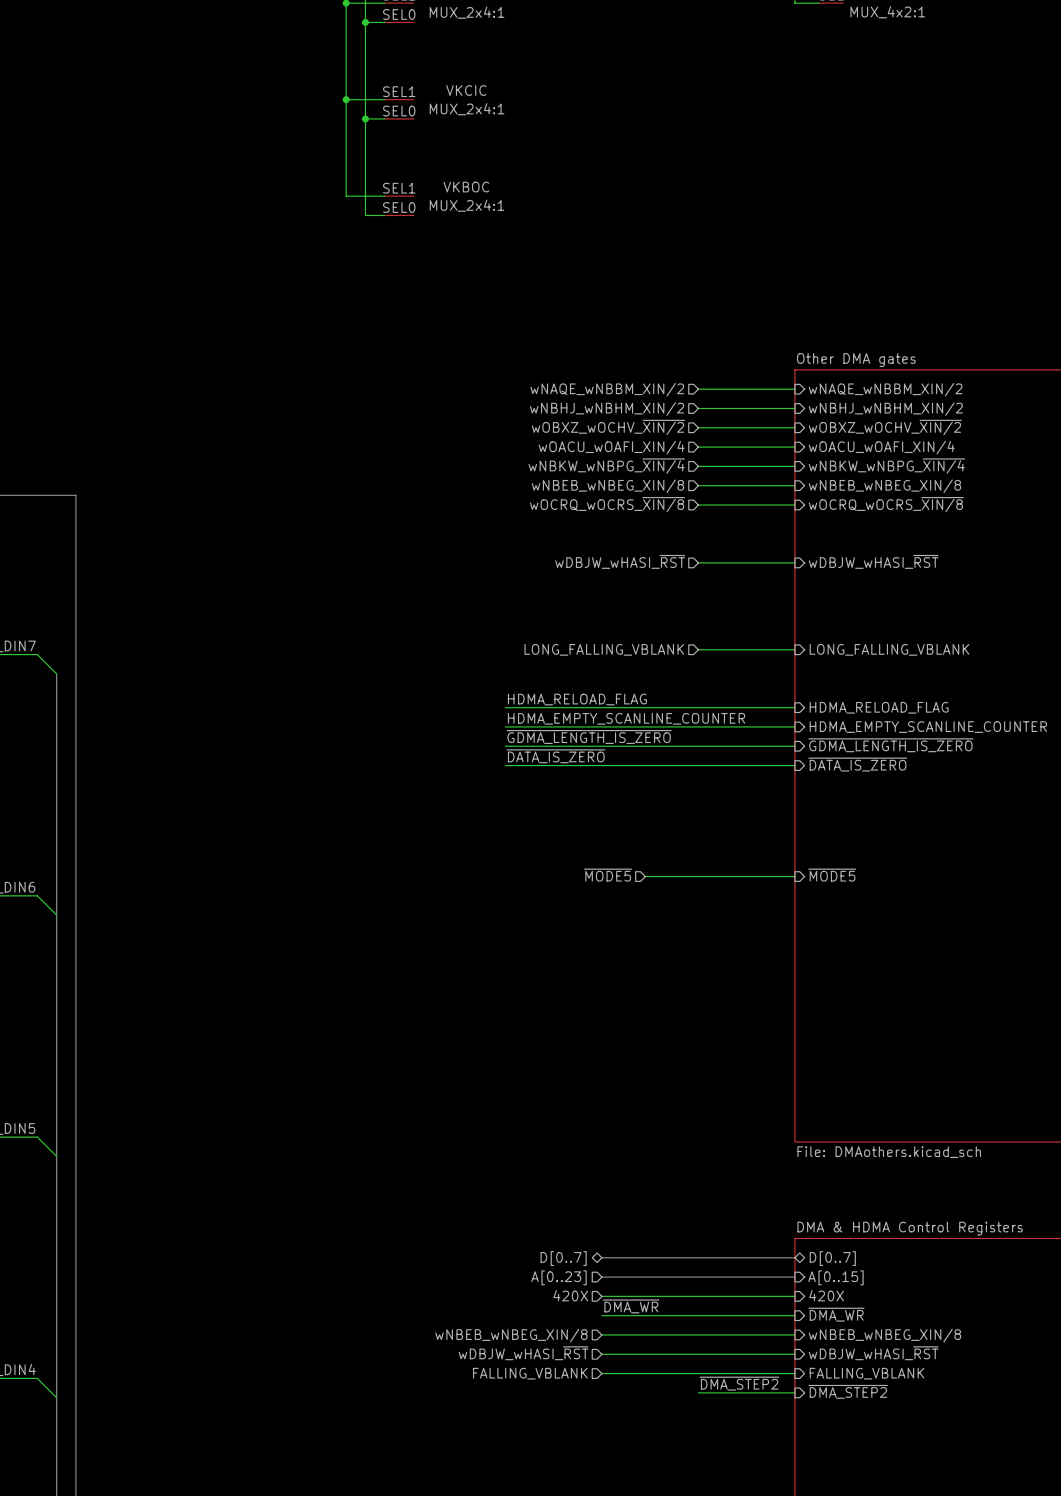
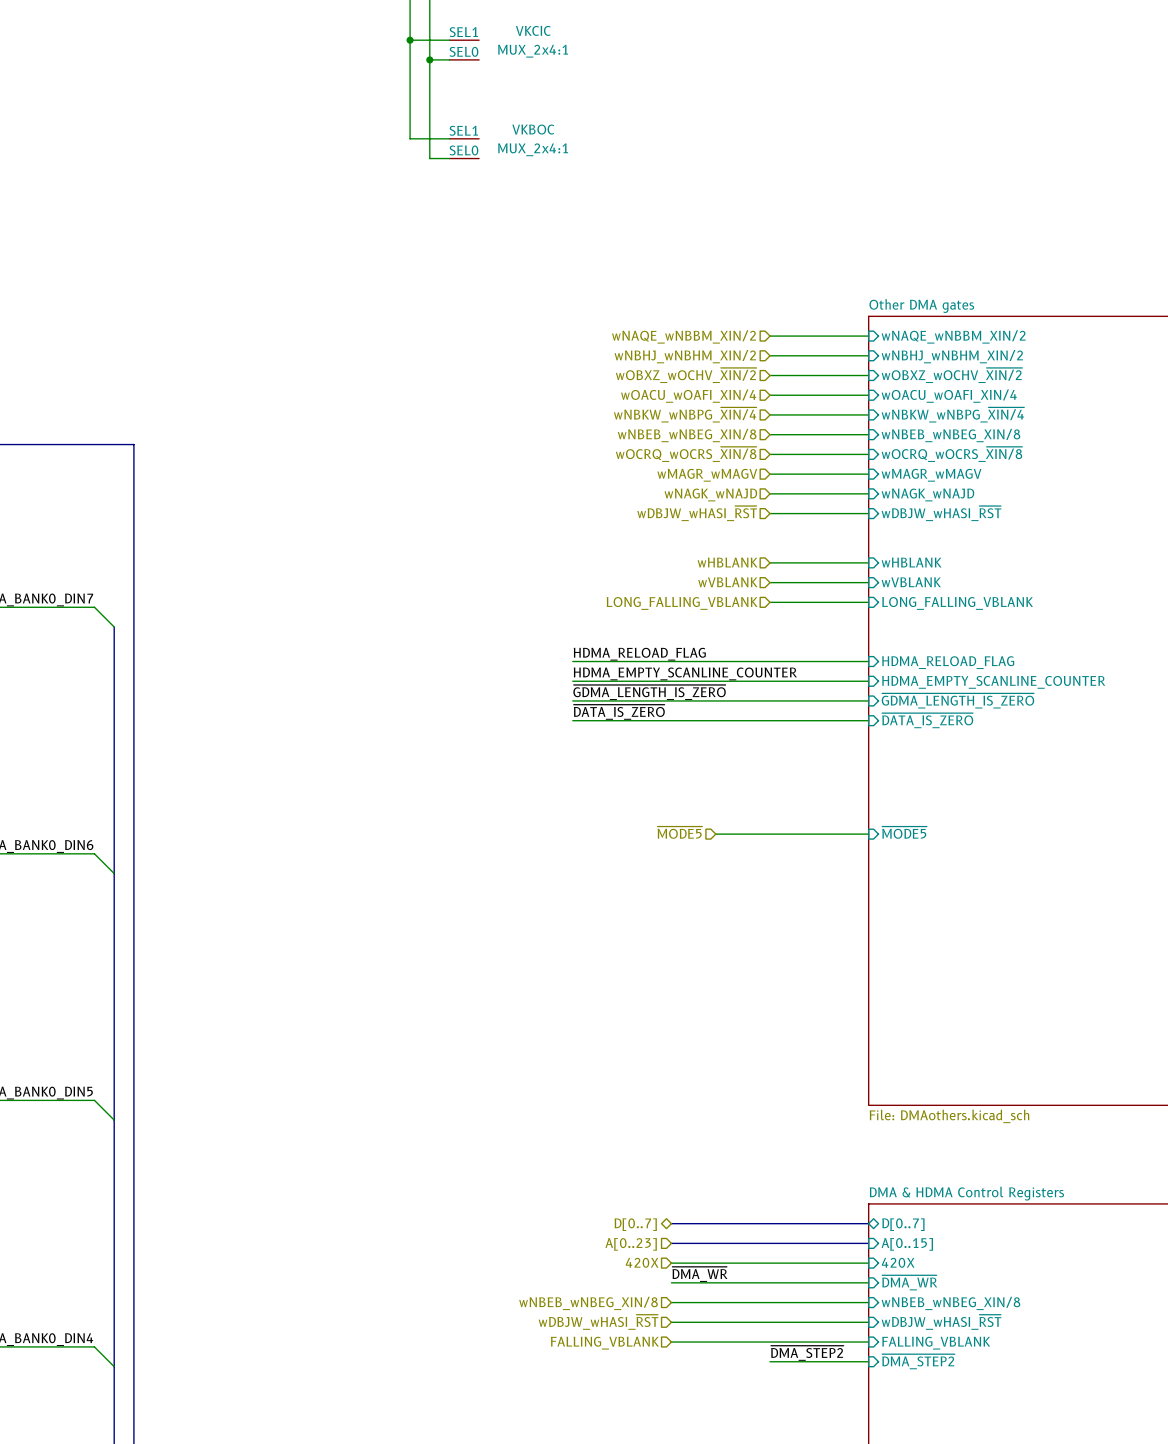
hierarchical label: none -> wMAGR_wMAGV (707, 475)
wire: none -> (770, 474) (868, 474)
sheet pin: none -> wMAGR_wMAGV (931, 475)
hierarchical label: none -> wNAGK_wNAJD (710, 494)
wire: none -> (770, 493) (868, 493)
sheet pin: none -> wNAGK_wNAJD (927, 494)
hierarchical label: none -> wHBLANK (727, 562)
sheet pin: none -> wHBLANK (911, 562)
wire: none -> (770, 562) (868, 562)
hierarchical label: none -> wVBLANK (727, 582)
wire: none -> (770, 582) (868, 582)
sheet pin: none -> wVBLANK (911, 582)

